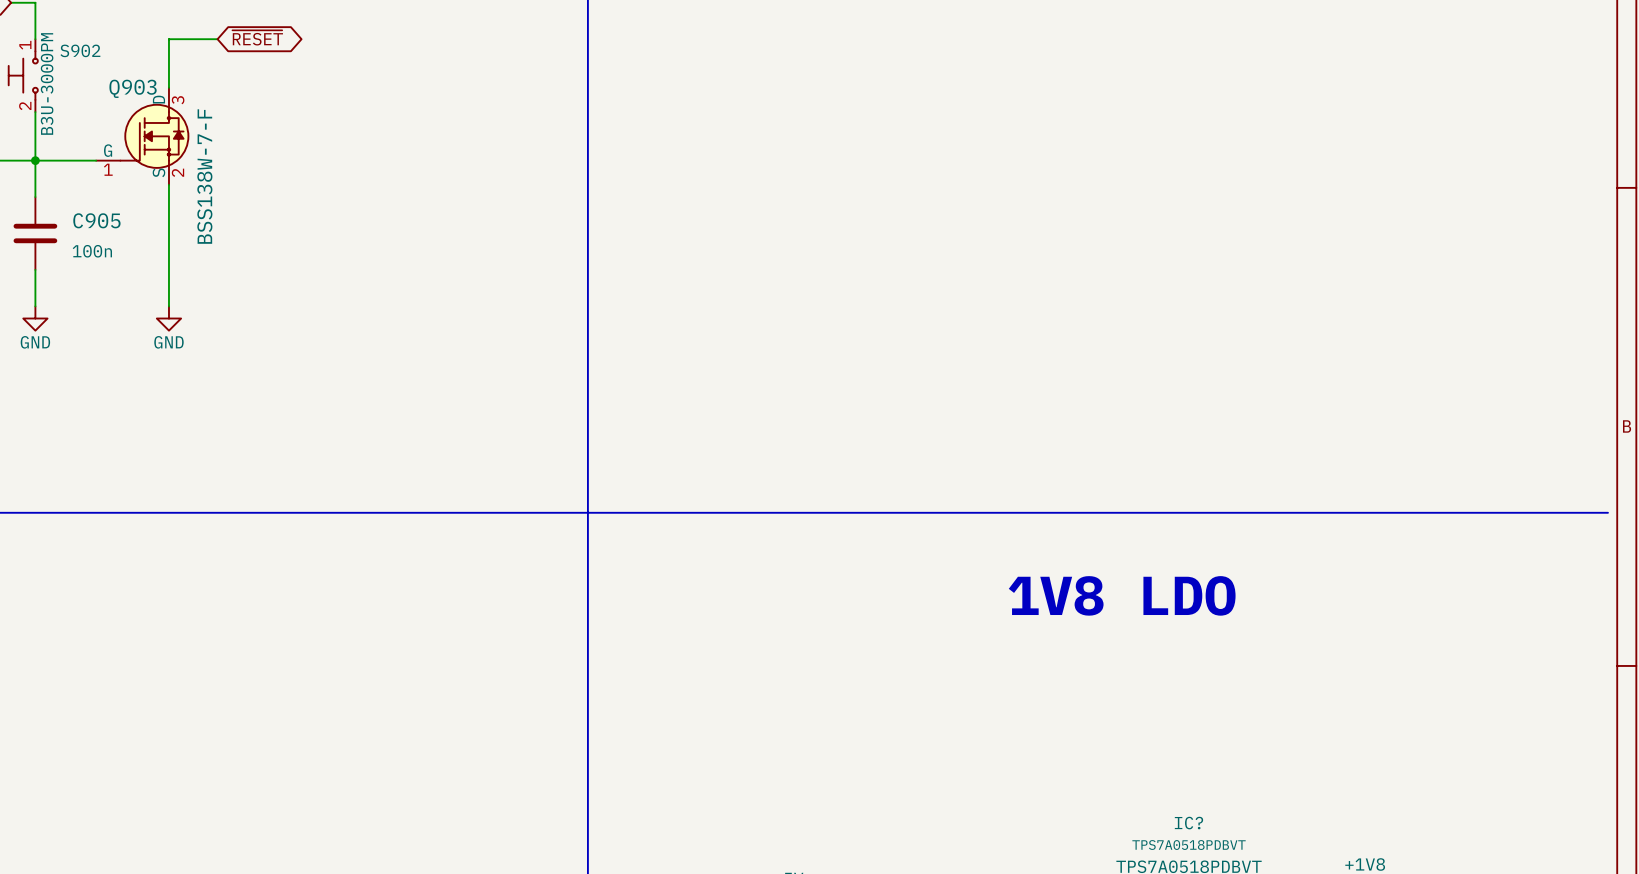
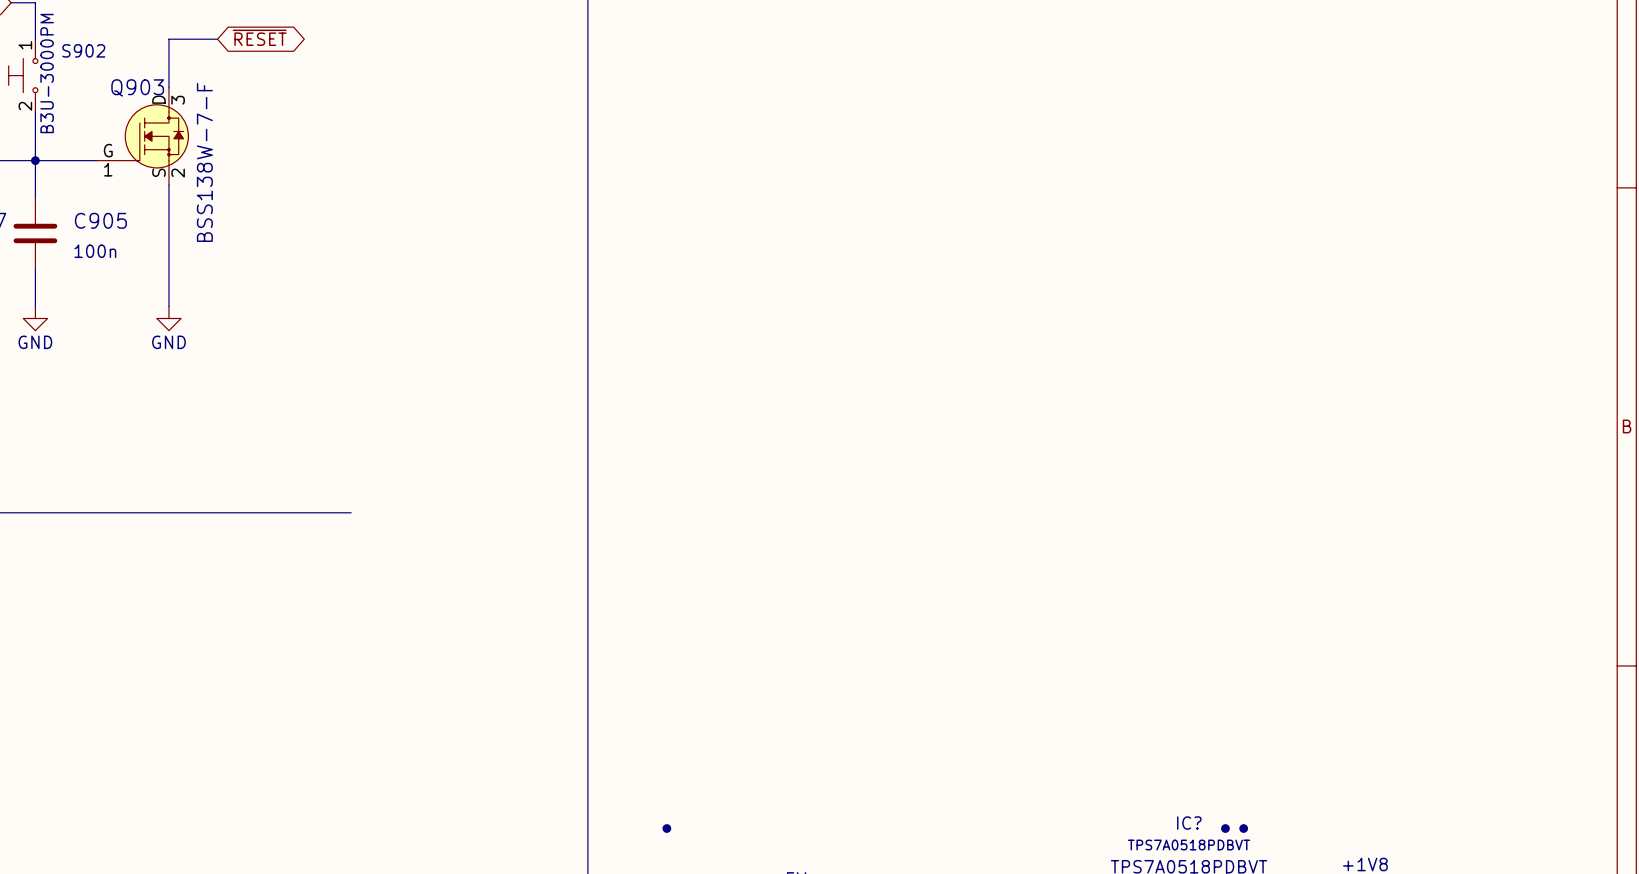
line: (351, 512) (1607, 512) -> none
text: 1V8 LDO (1122, 595) -> none
junction: none -> (666, 828)
junction: none -> (1225, 828)
junction: none -> (1243, 828)

